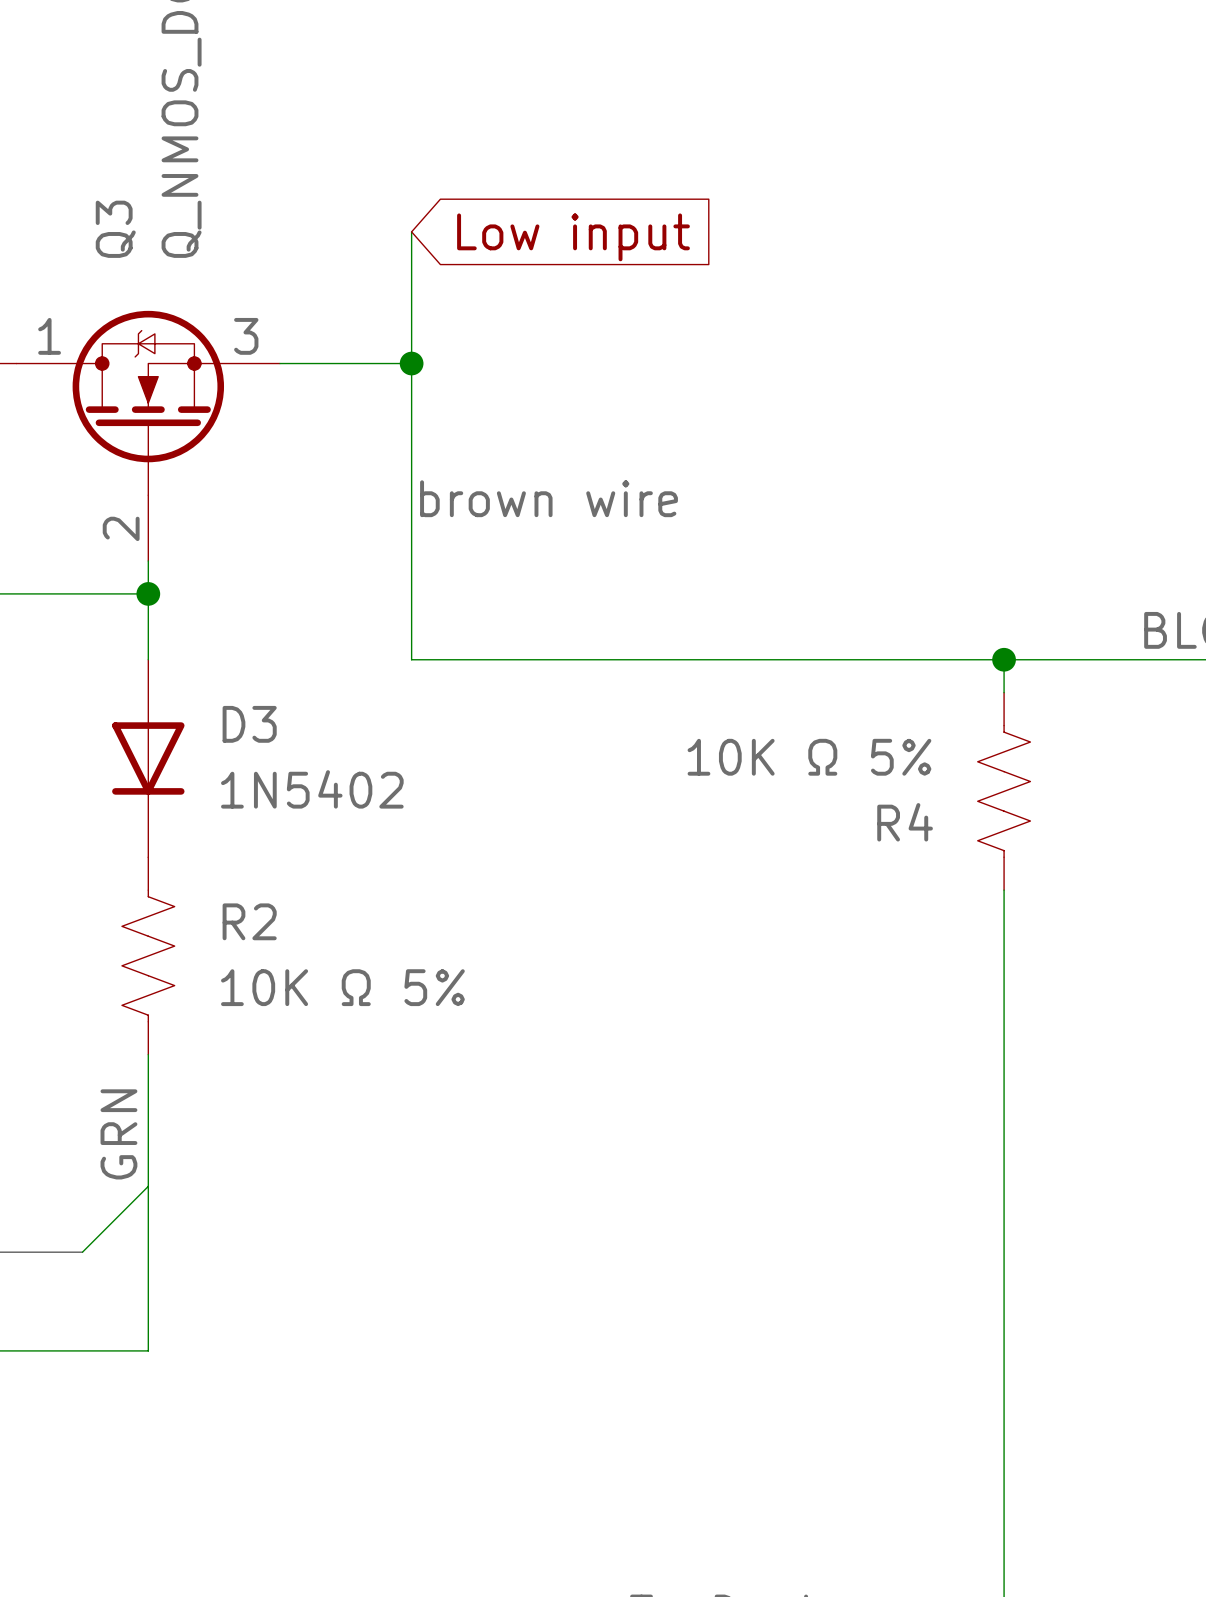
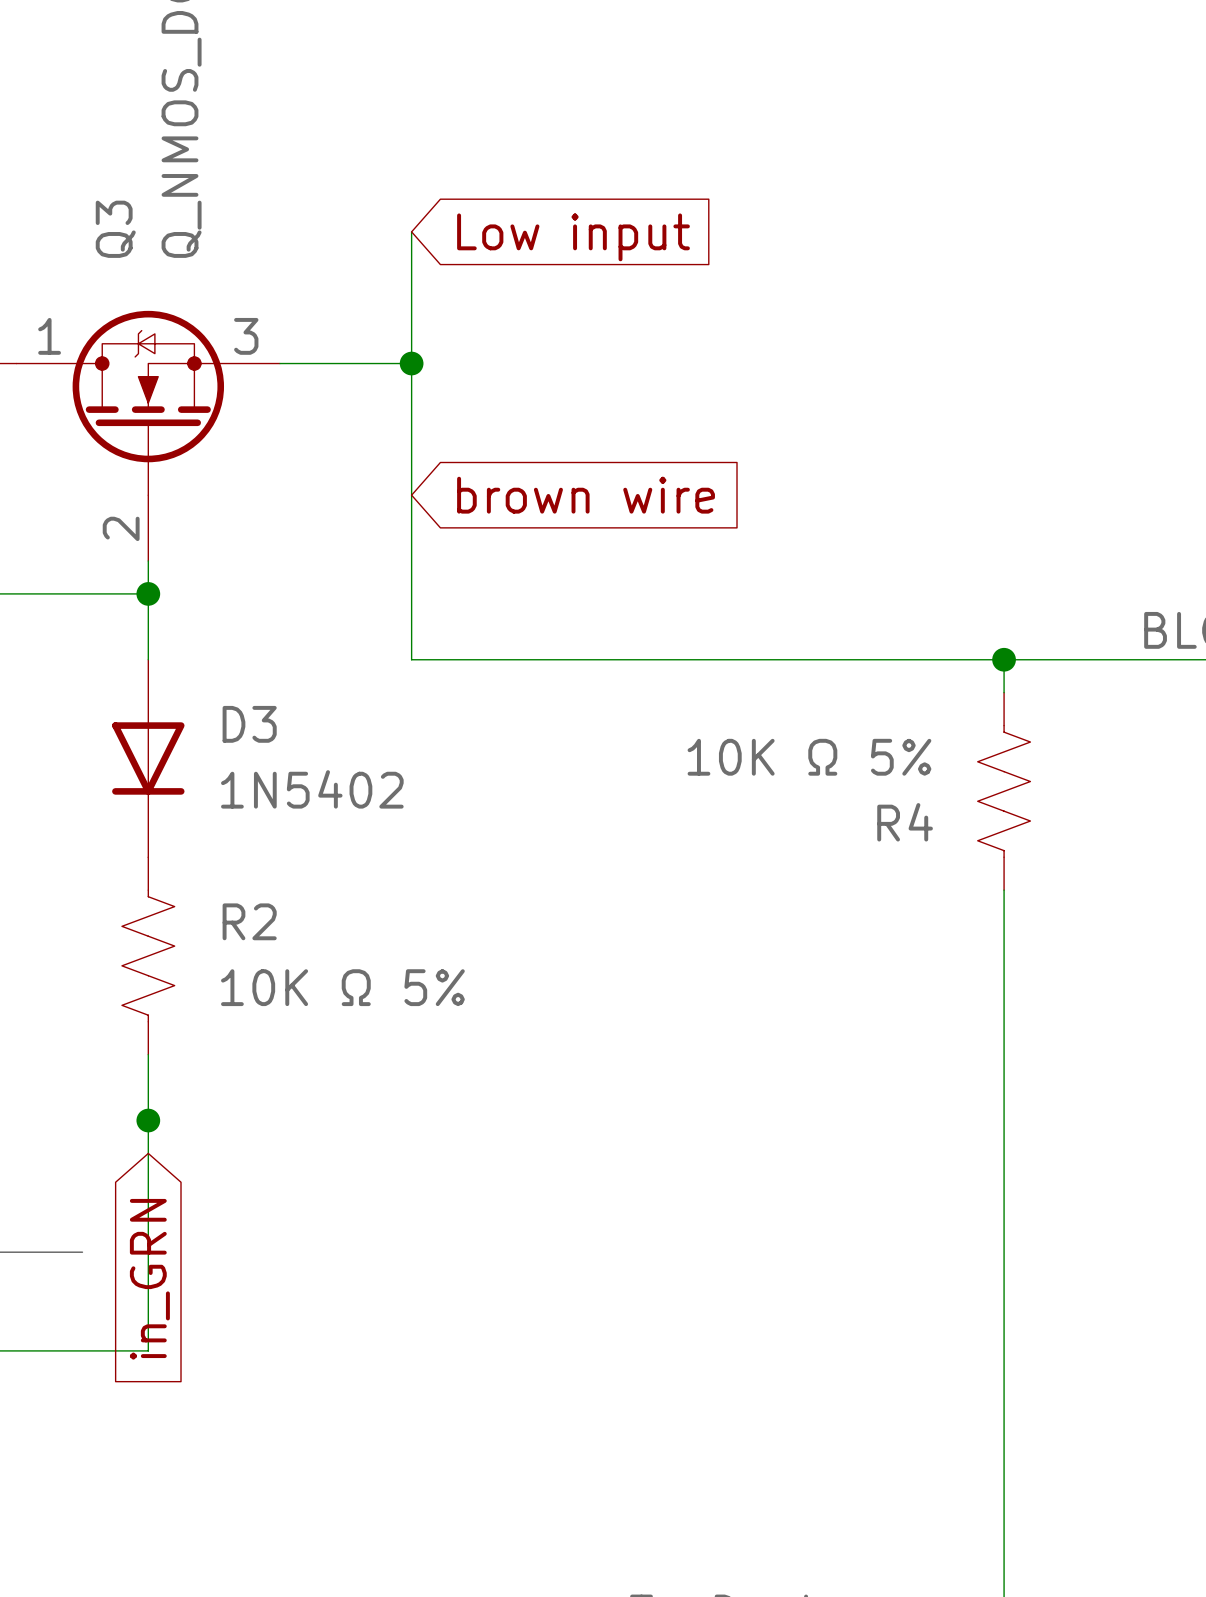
global label: none -> brown wire (586, 495)
label: brown wire (549, 498) -> none
junction: none -> (148, 1120)
label: GRN (118, 1134) -> none
wire: (148, 1186) (82, 1252) -> none
global label: none -> in_GRN (149, 1279)

